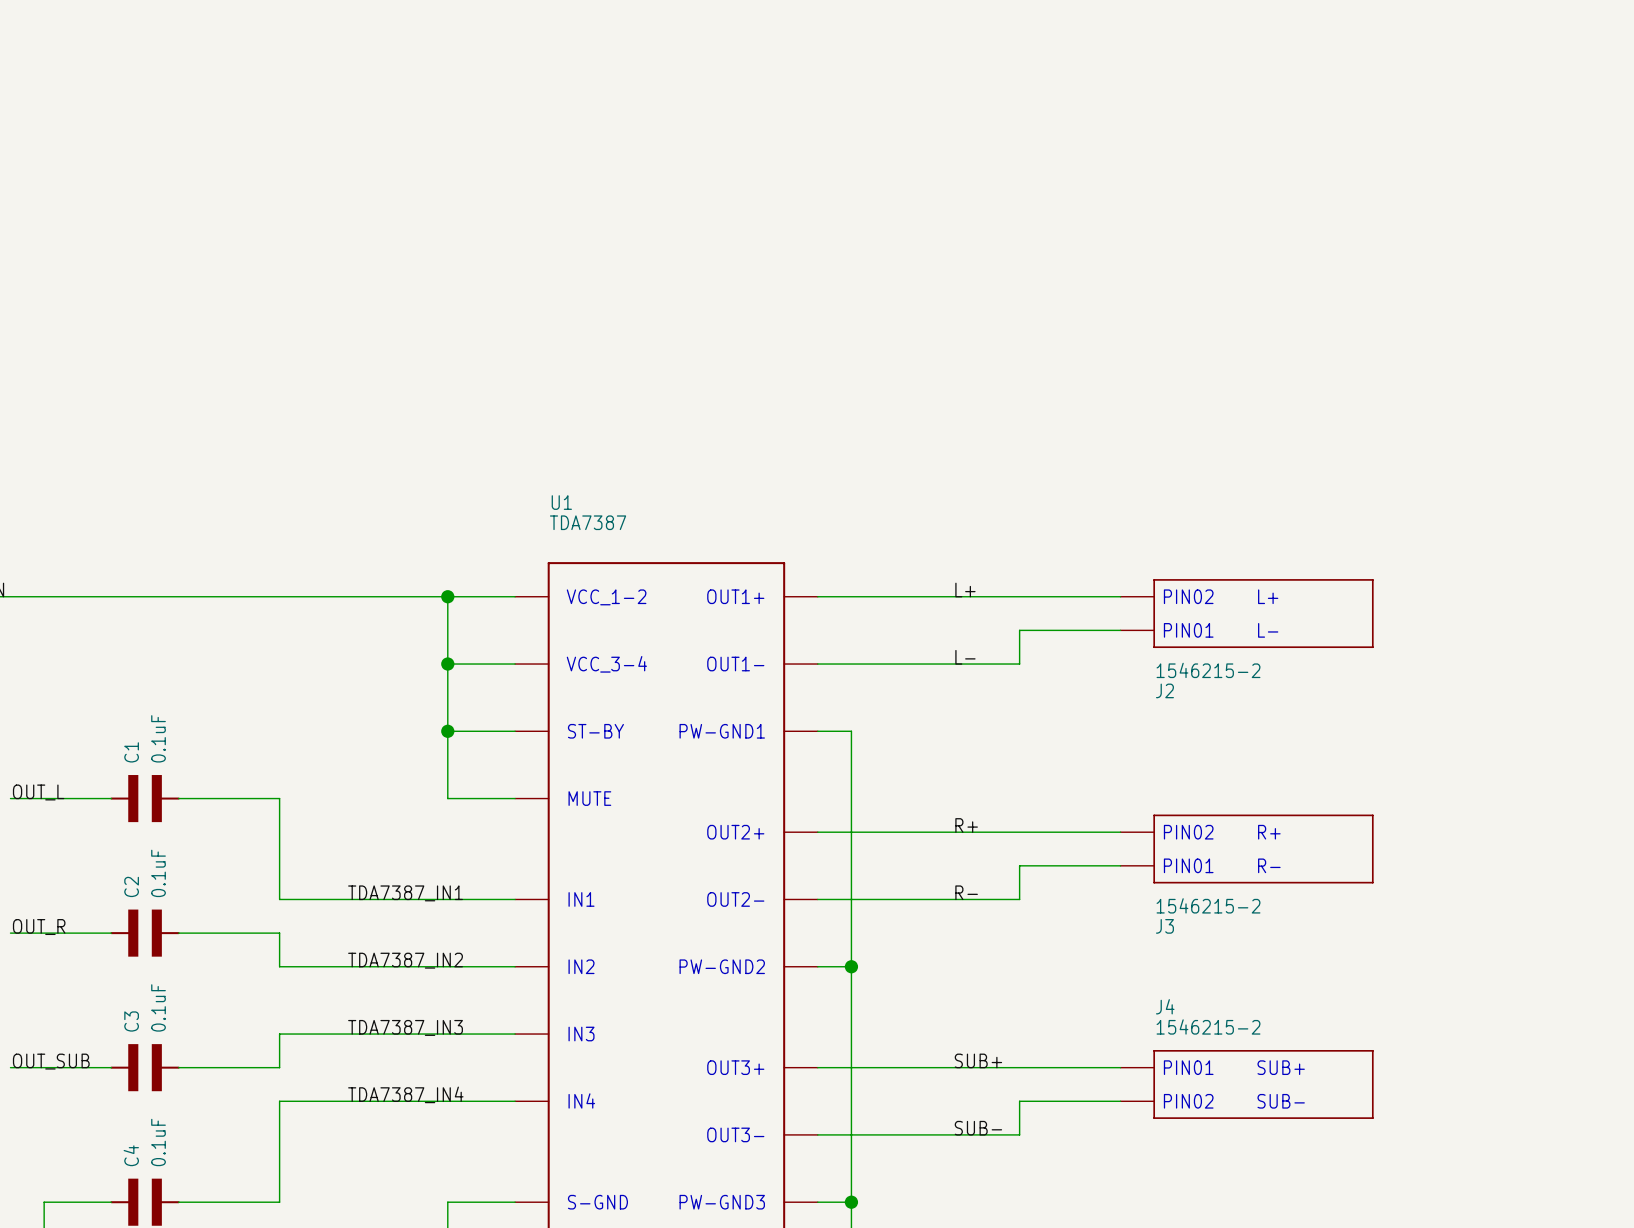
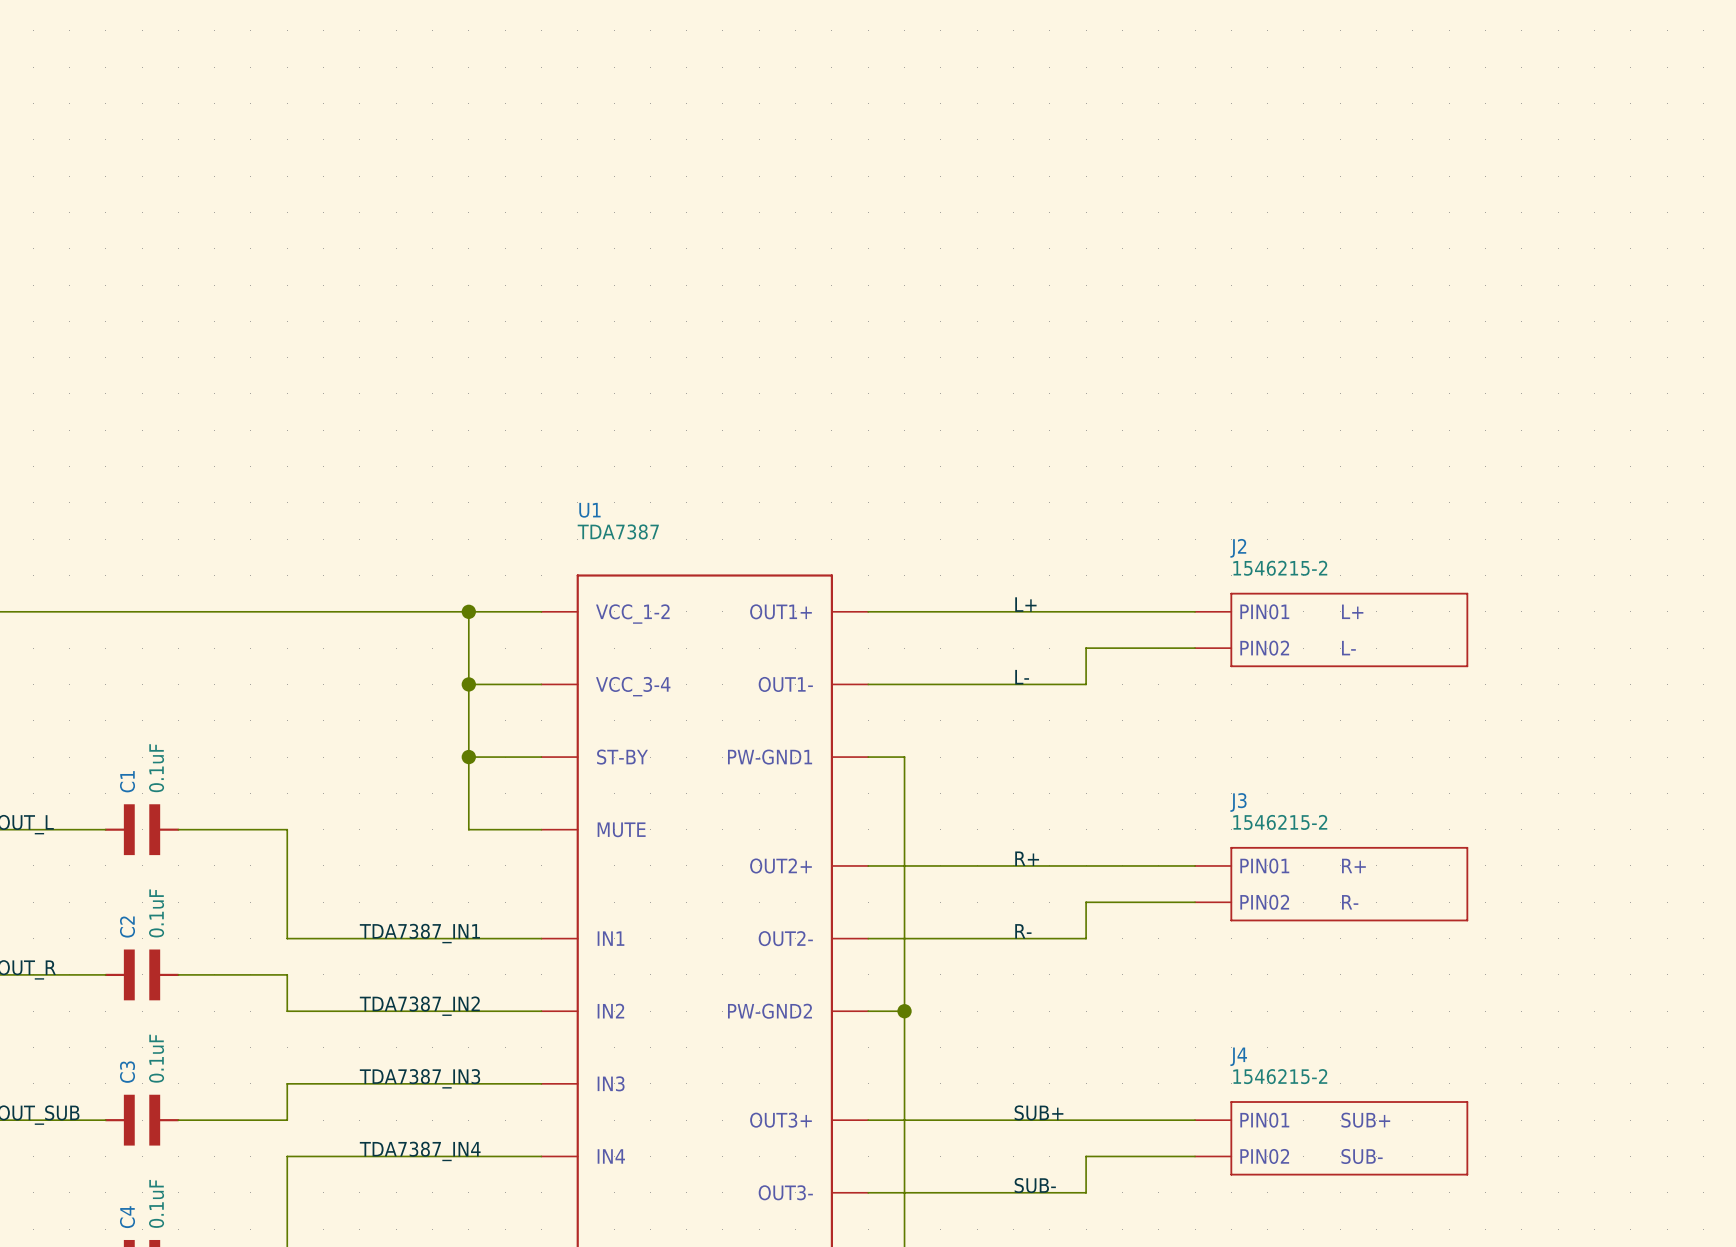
J2 text: PIN02 (1188, 596) -> PIN01 (1264, 611)
J2 text: PIN01 (1188, 630) -> PIN02 (1264, 648)
J2 value position: 1546215-2 (1208, 670) -> 1546215-2 (1280, 568)
J2 name position: J2 (1164, 690) -> J2 (1238, 548)
J3 text: PIN02 (1188, 832) -> PIN01 (1264, 865)
J3 text: PIN01 (1188, 865) -> PIN02 (1264, 902)
J3 value position: 1546215-2 (1208, 905) -> 1546215-2 (1280, 822)
J3 name position: J3 (1164, 926) -> J3 (1238, 802)

